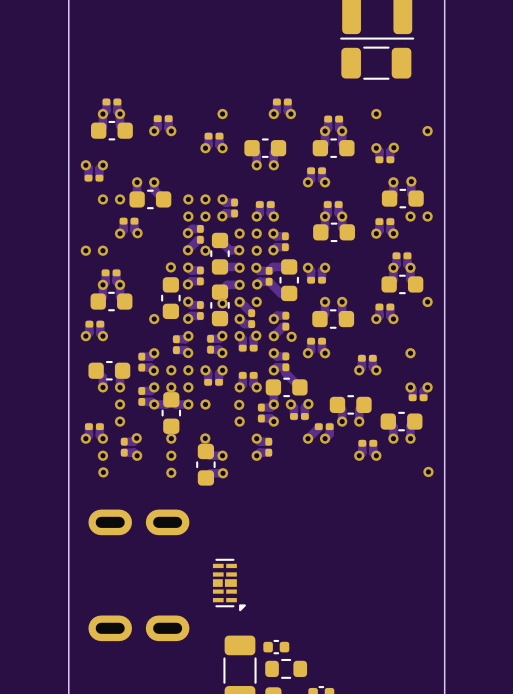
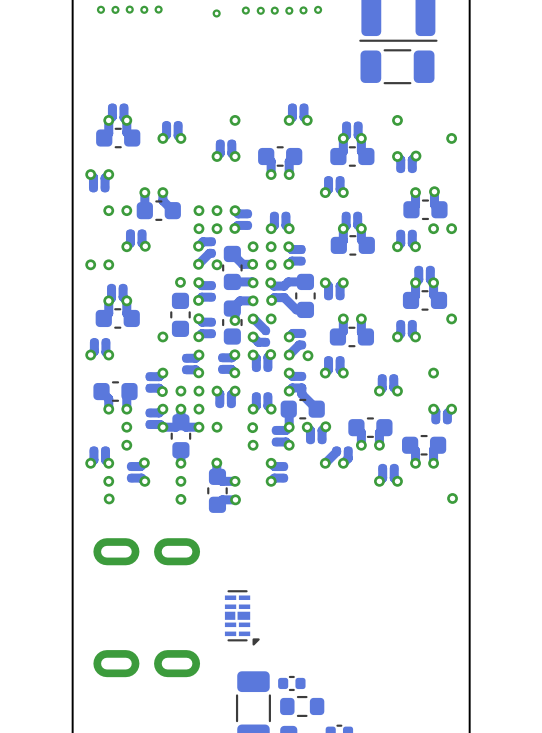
via: none -> (100, 9)
via: none -> (115, 9)
via: none -> (129, 9)
via: none -> (144, 9)
via: none -> (158, 9)
via: none -> (245, 10)
via: none -> (303, 10)
via: none -> (318, 9)
via: none -> (260, 10)
via: none -> (274, 10)
via: none -> (289, 10)
via: none -> (216, 13)

